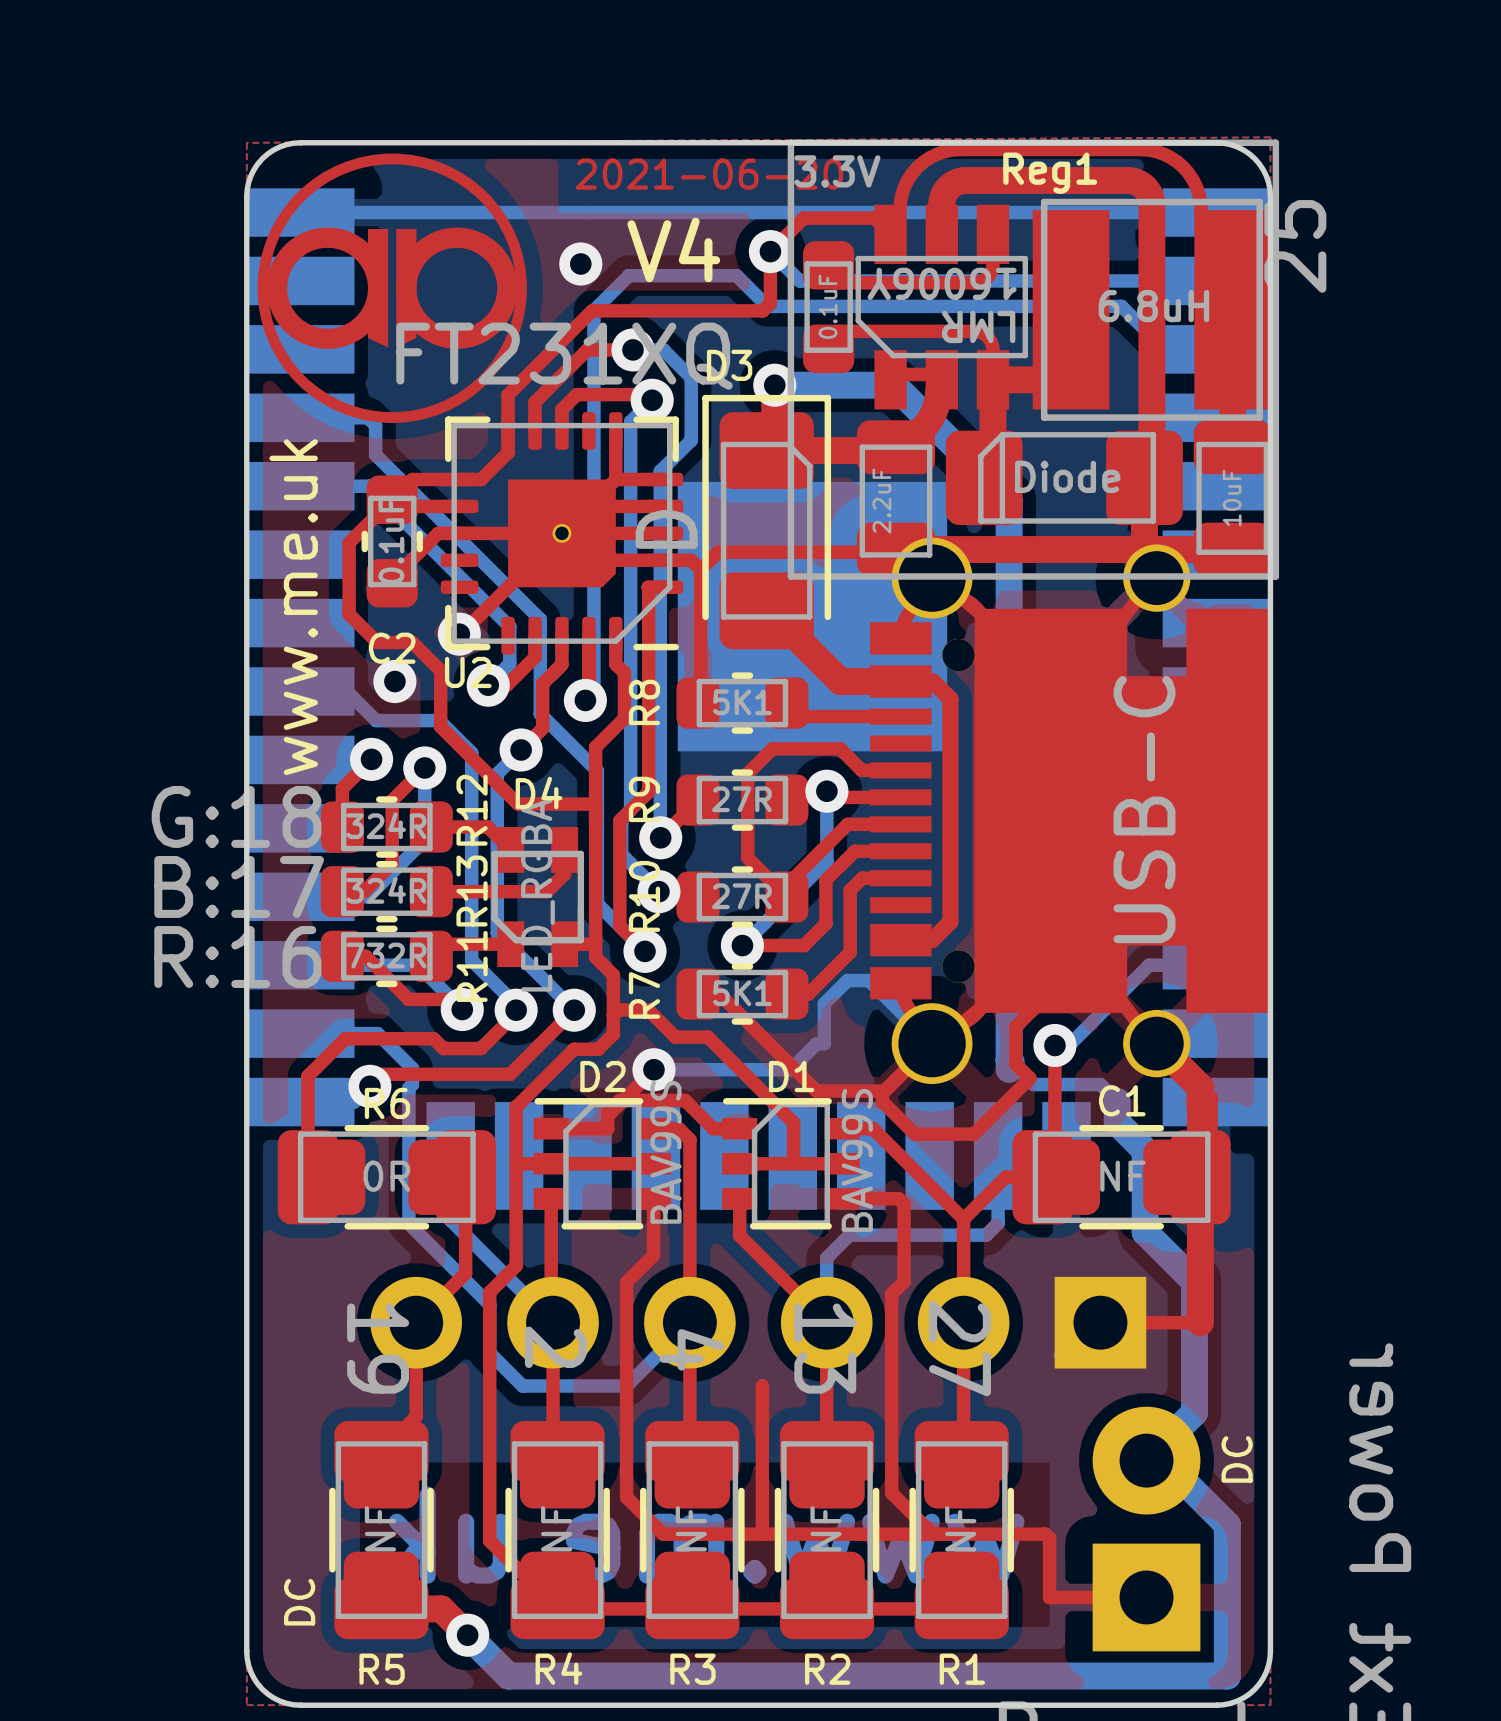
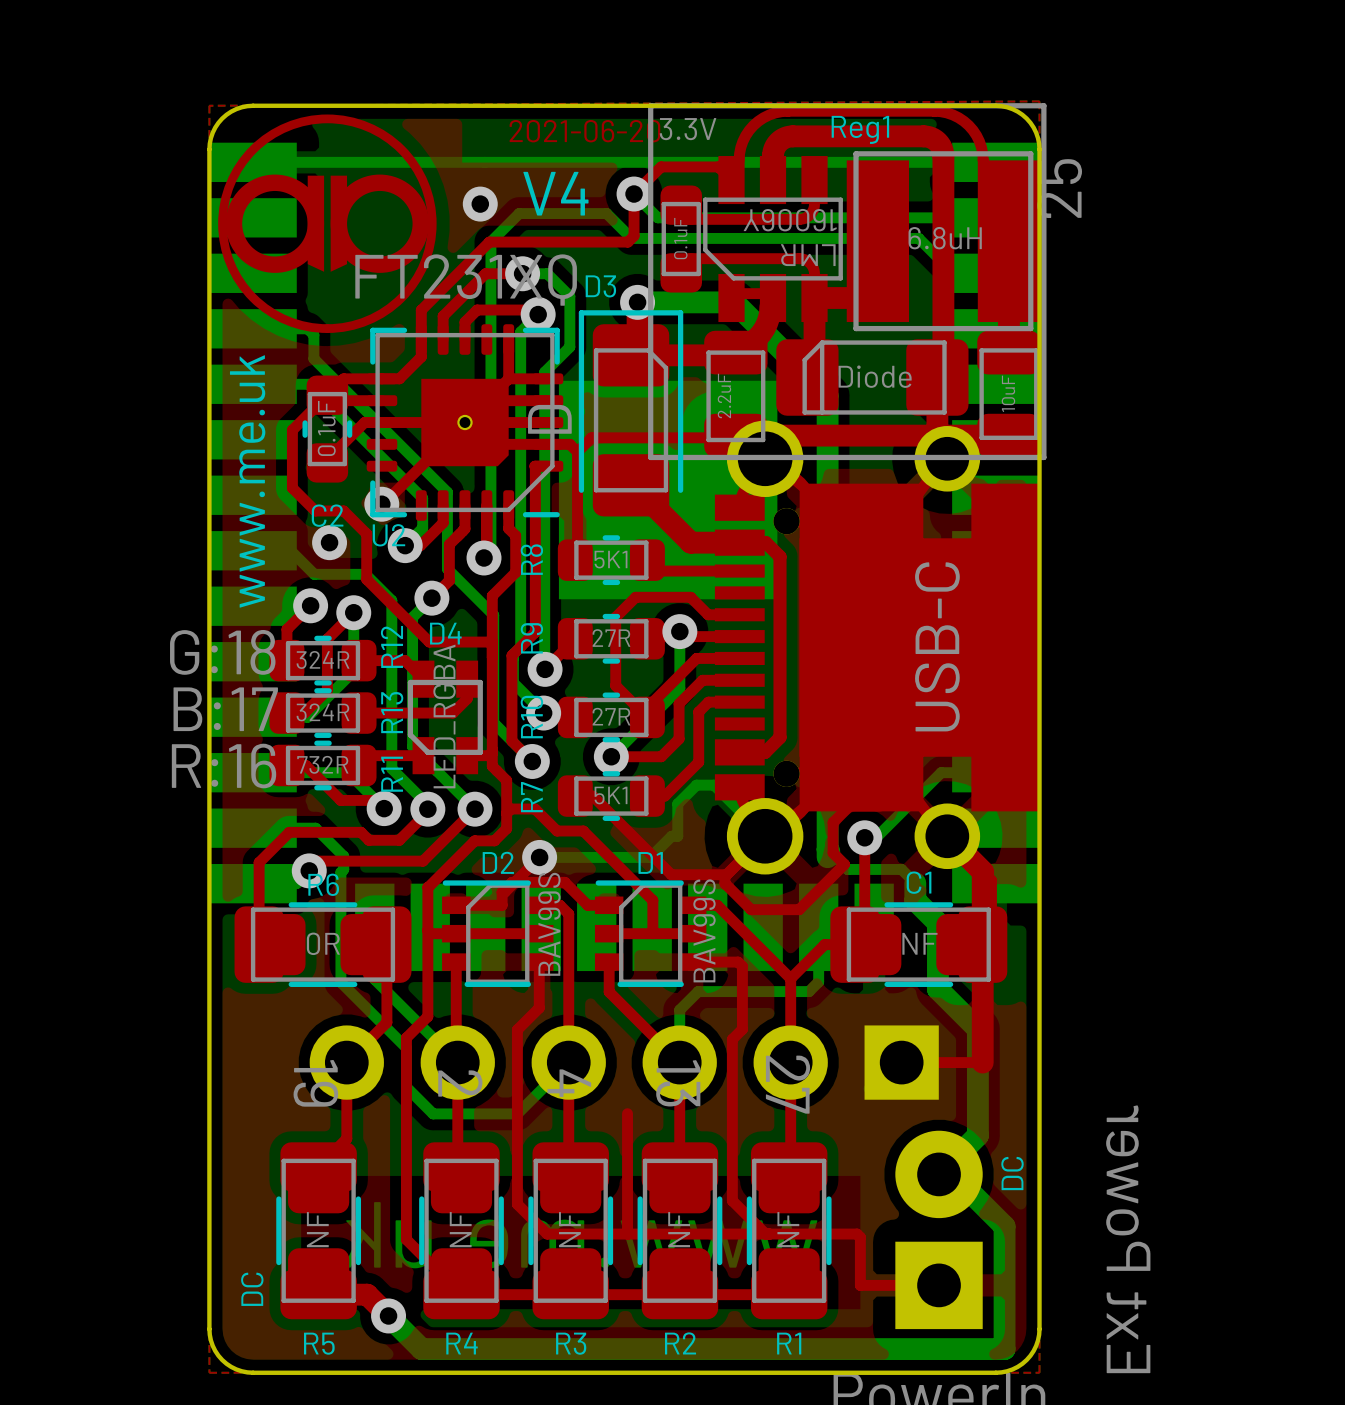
part footprint: [870, 537, 1271, 1085] -> [714, 420, 1040, 875]

